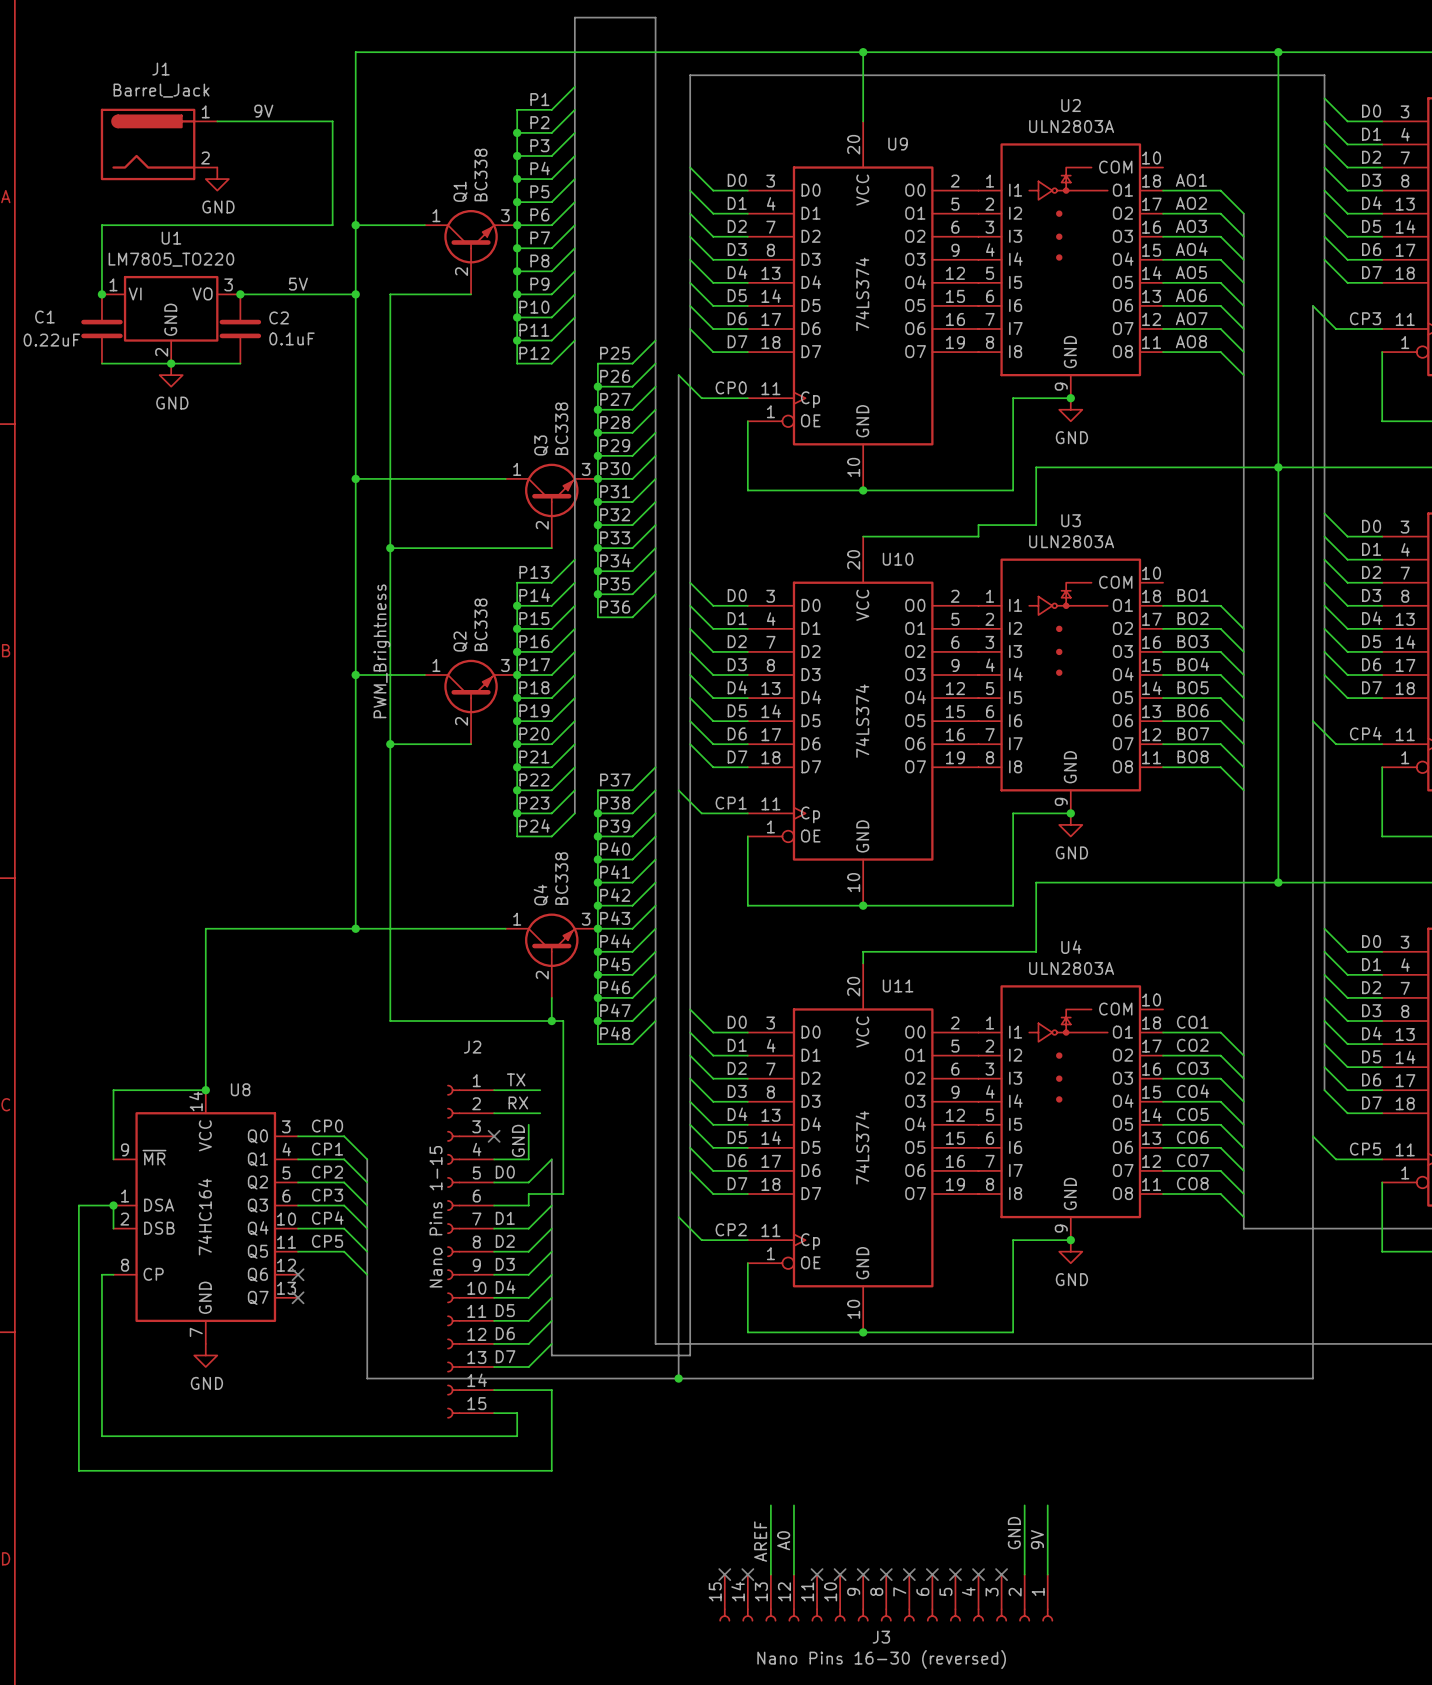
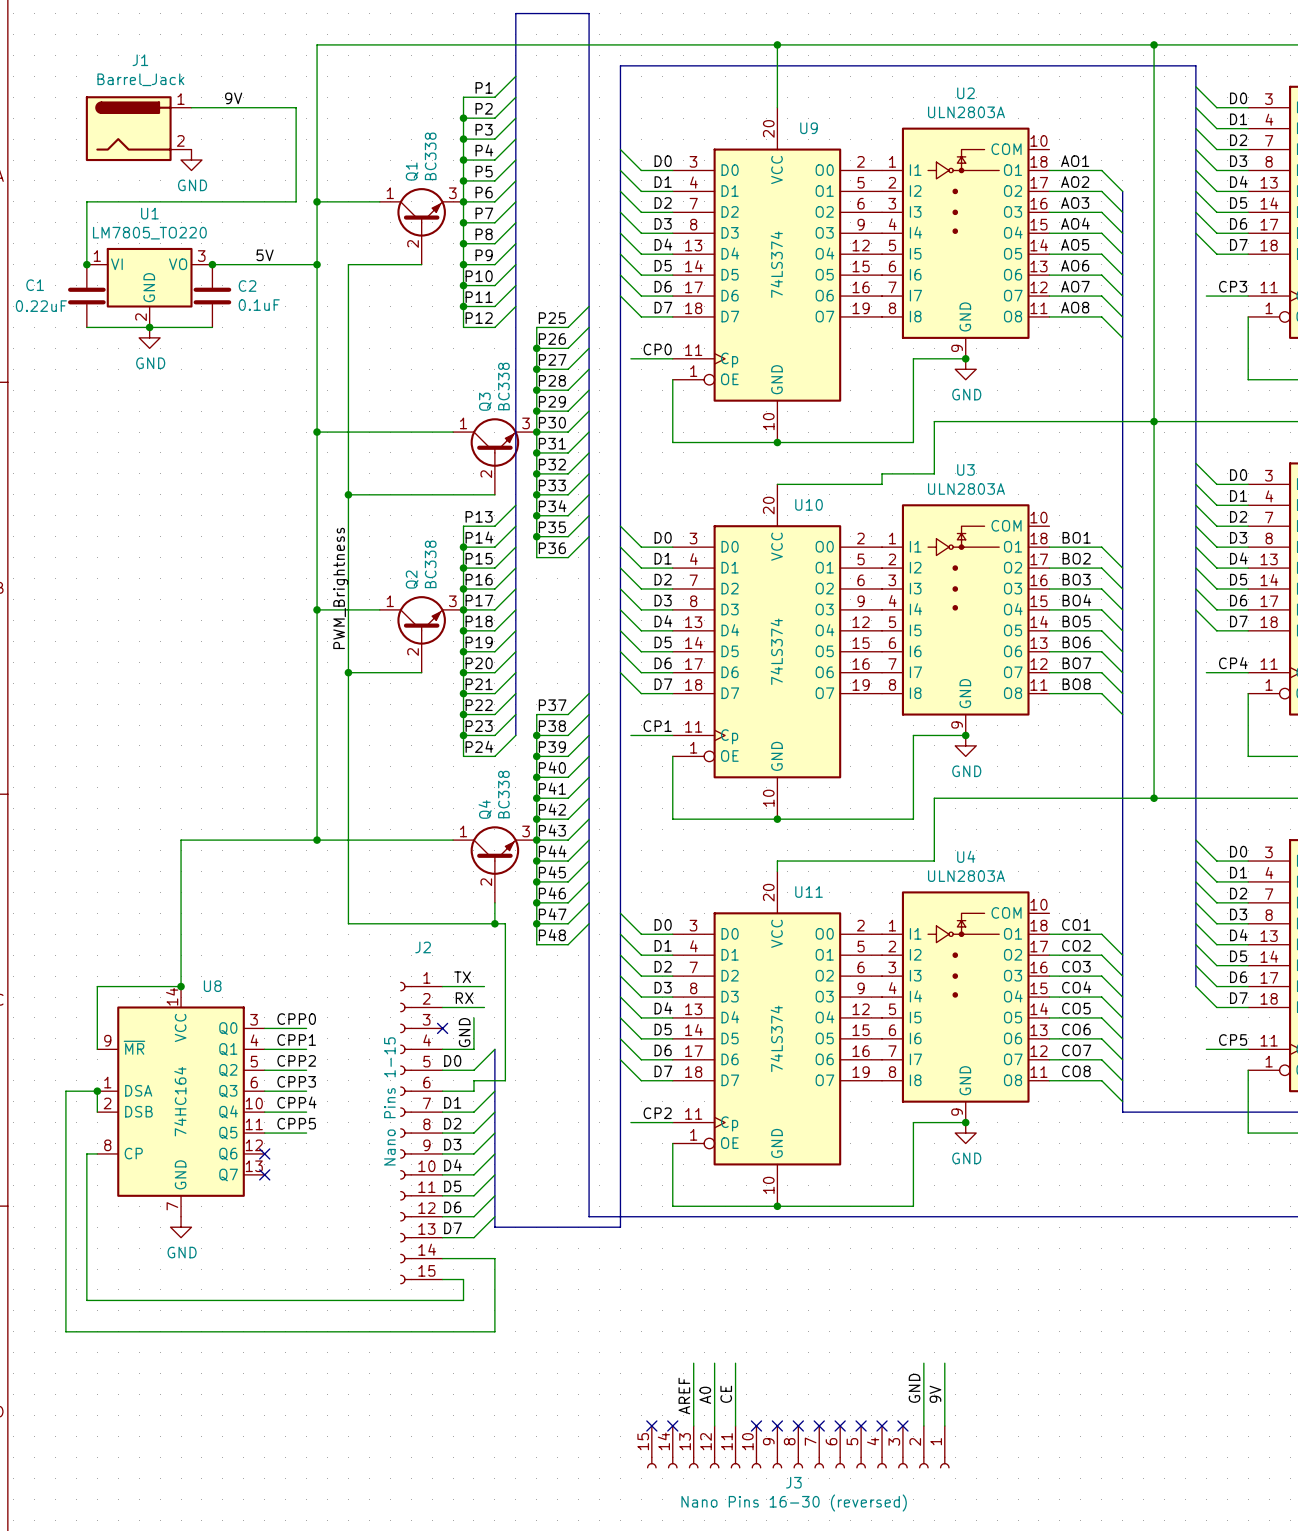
wire: (1312, 305) (1336, 329) -> none
bus: (1312, 305) (1312, 1378) (367, 1378) (367, 1159) -> none
wire: (678, 375) (701, 398) -> none
bus: (678, 375) (678, 1378) -> none
wire: (1312, 721) (1336, 744) -> none
wire: (678, 790) (701, 813) -> none
label: CP0 (327, 1126) -> CPP0 (296, 1019)
wire: (344, 1136) (367, 1159) -> none
wire: (1312, 1136) (1336, 1159) -> none
label: CP1 (327, 1149) -> CPP1 (296, 1040)
wire: (344, 1159) (367, 1182) -> none
label: CP2 (327, 1172) -> CPP2 (296, 1060)
wire: (344, 1182) (367, 1205) -> none
label: CP3 (327, 1195) -> CPP3 (296, 1081)
wire: (344, 1205) (367, 1228) -> none
wire: (678, 1217) (701, 1240) -> none
label: CP4 (327, 1218) -> CPP4 (296, 1102)
wire: (344, 1228) (367, 1251) -> none
label: CP5 (327, 1241) -> CPP5 (296, 1123)
wire: (344, 1251) (367, 1274) -> none
junction: (678, 1378) -> none
wire: none -> (735, 1363) (735, 1425)
label: none -> CE (726, 1394)
no-connect mark: (817, 1574) -> none

